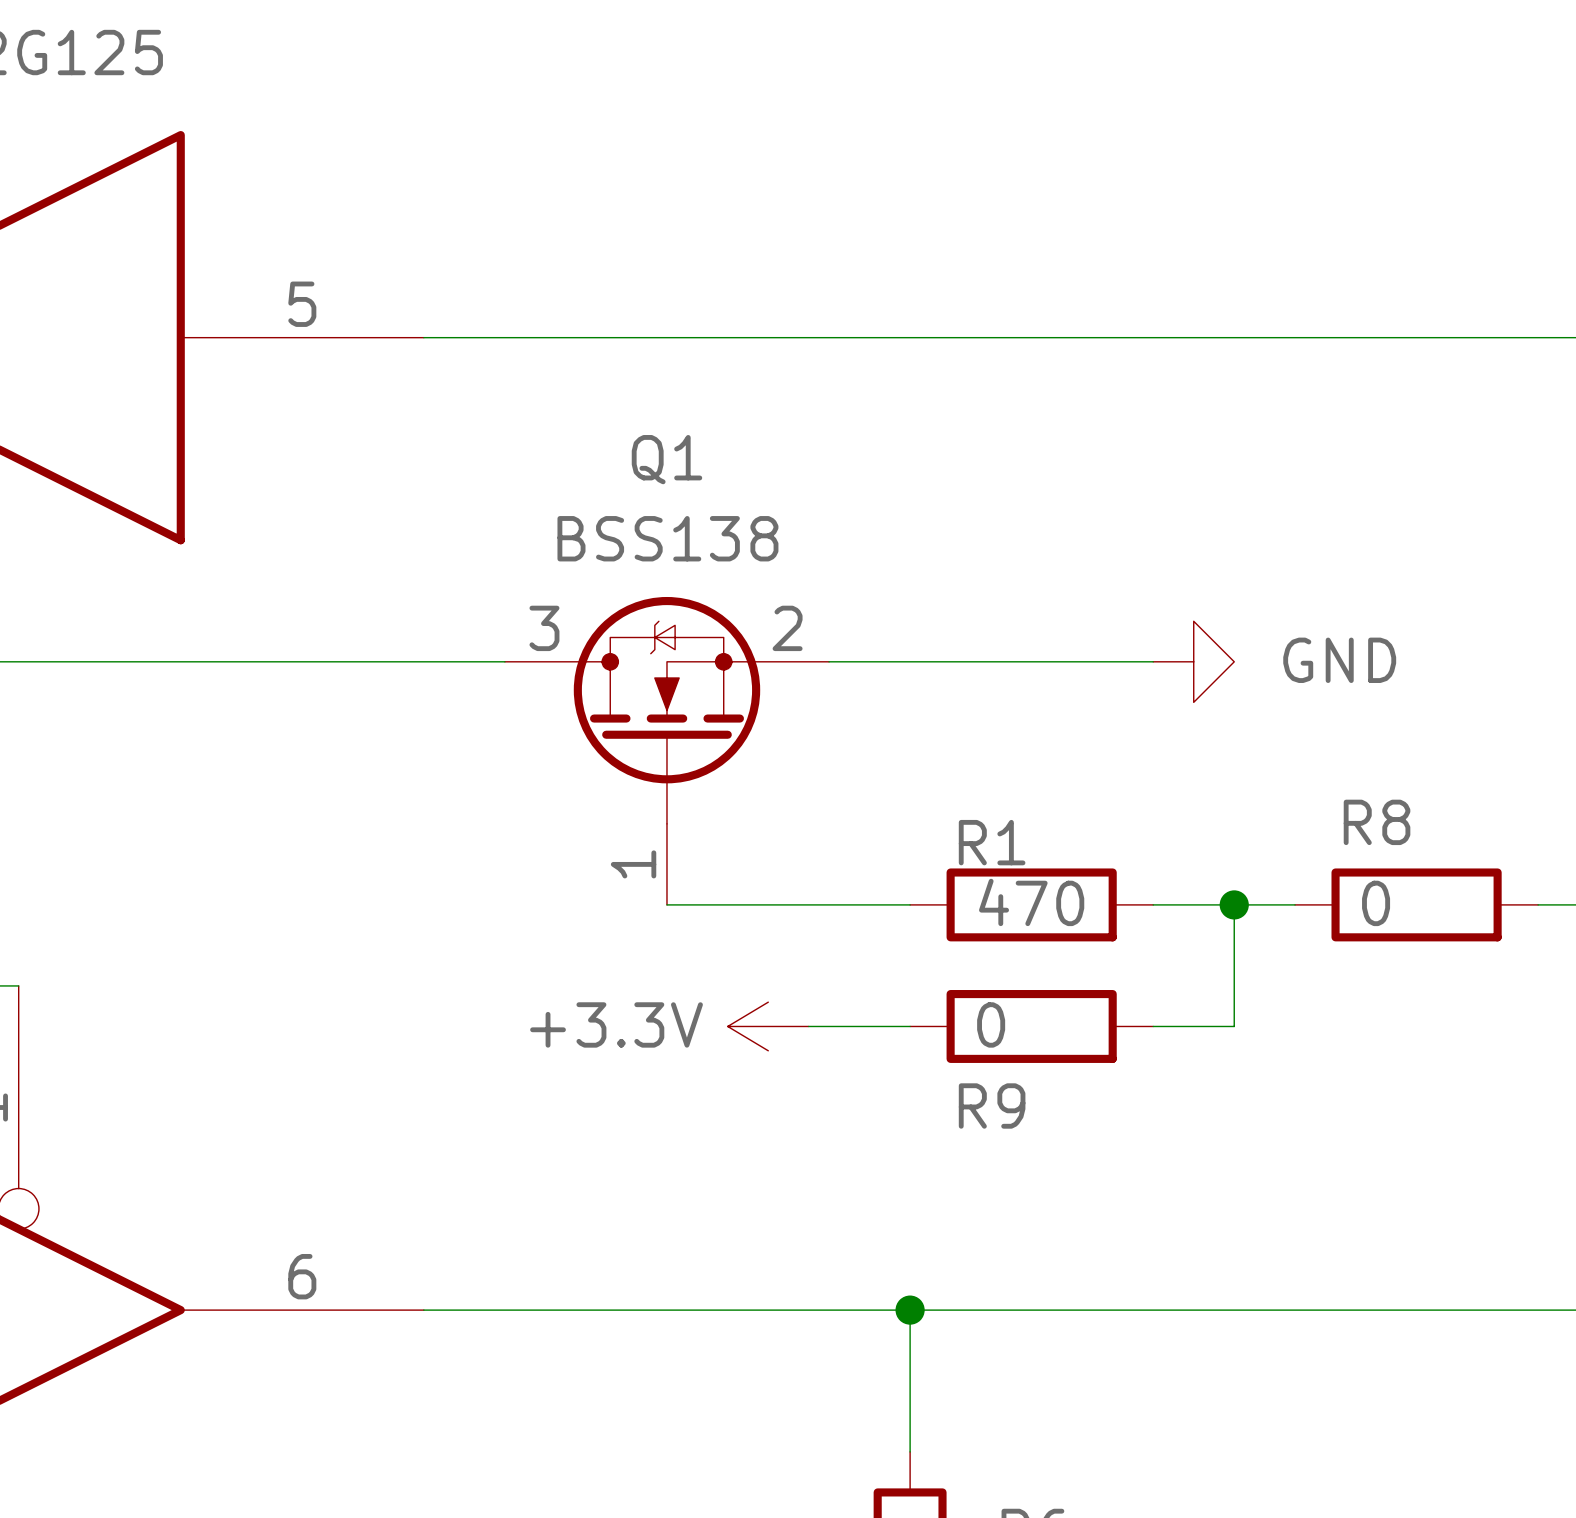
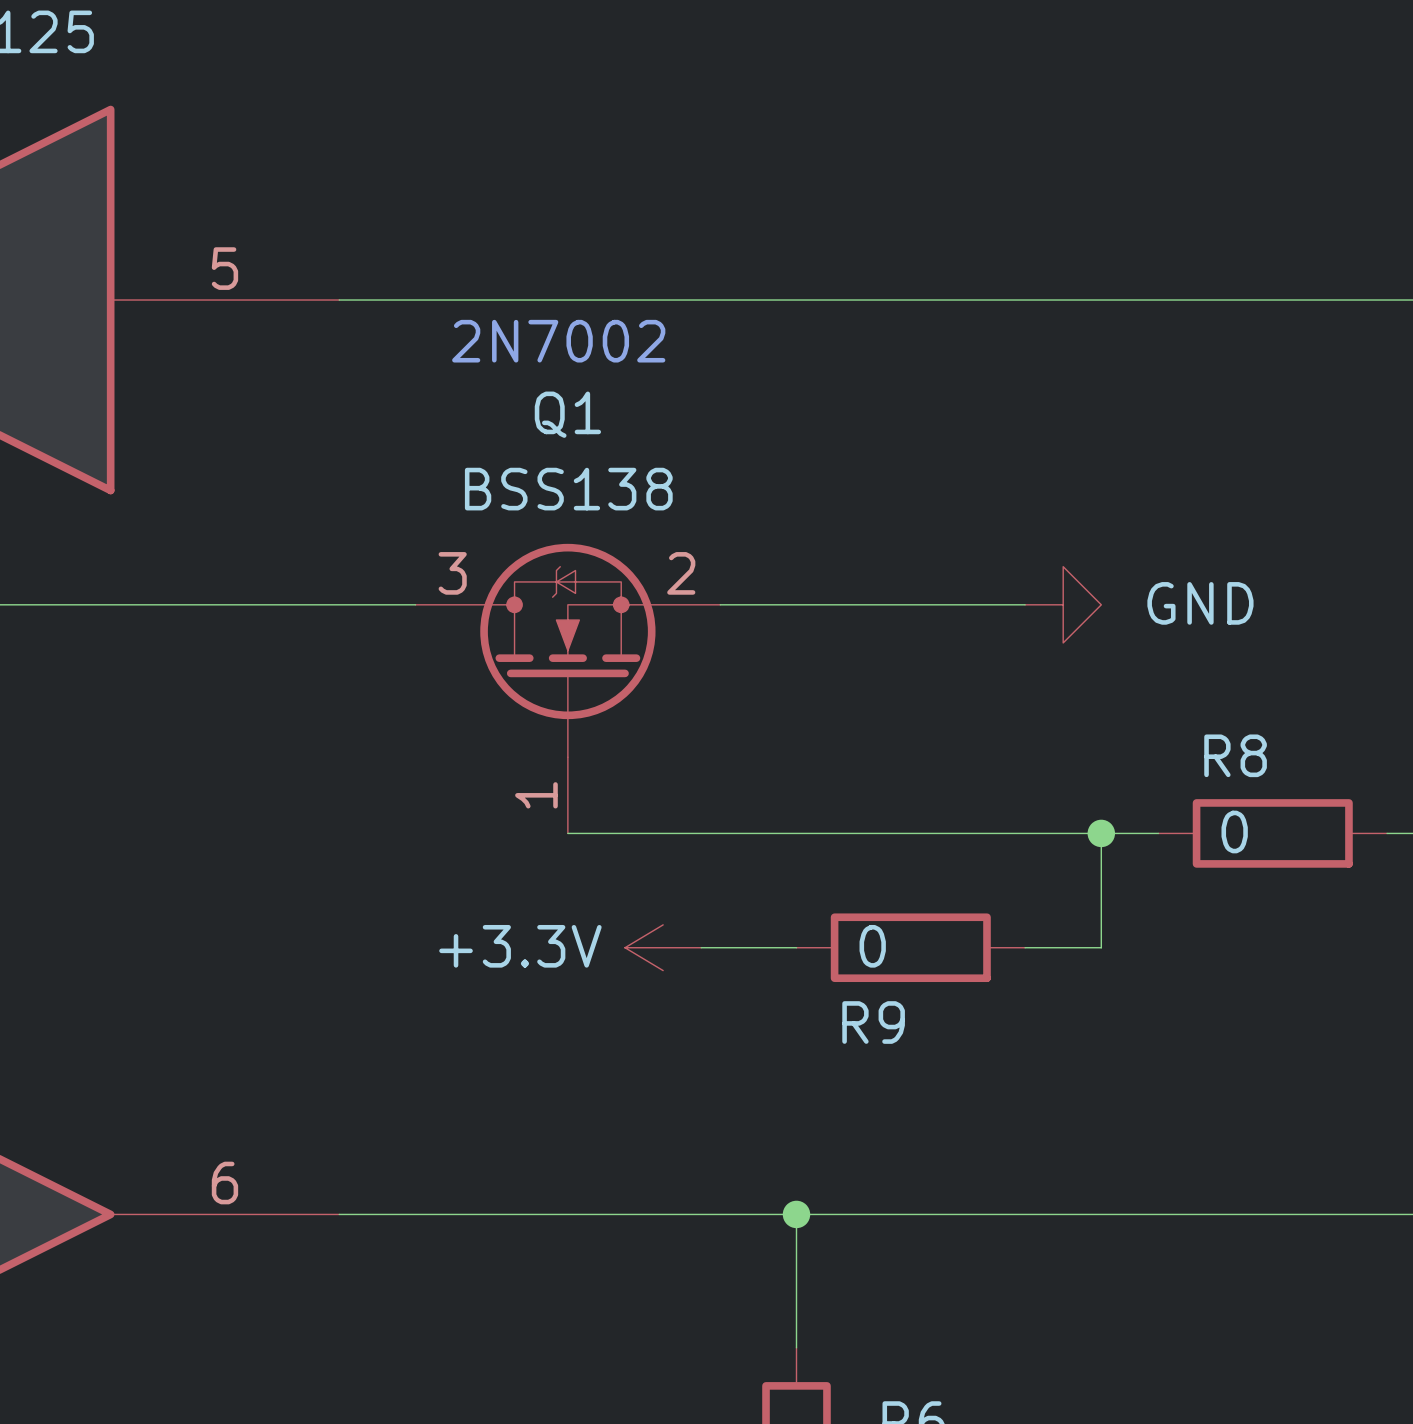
text: none -> 2N7002 (558, 341)
wire: none -> (796, 833) (1025, 833)
R1: 470 (1031, 904) -> none

